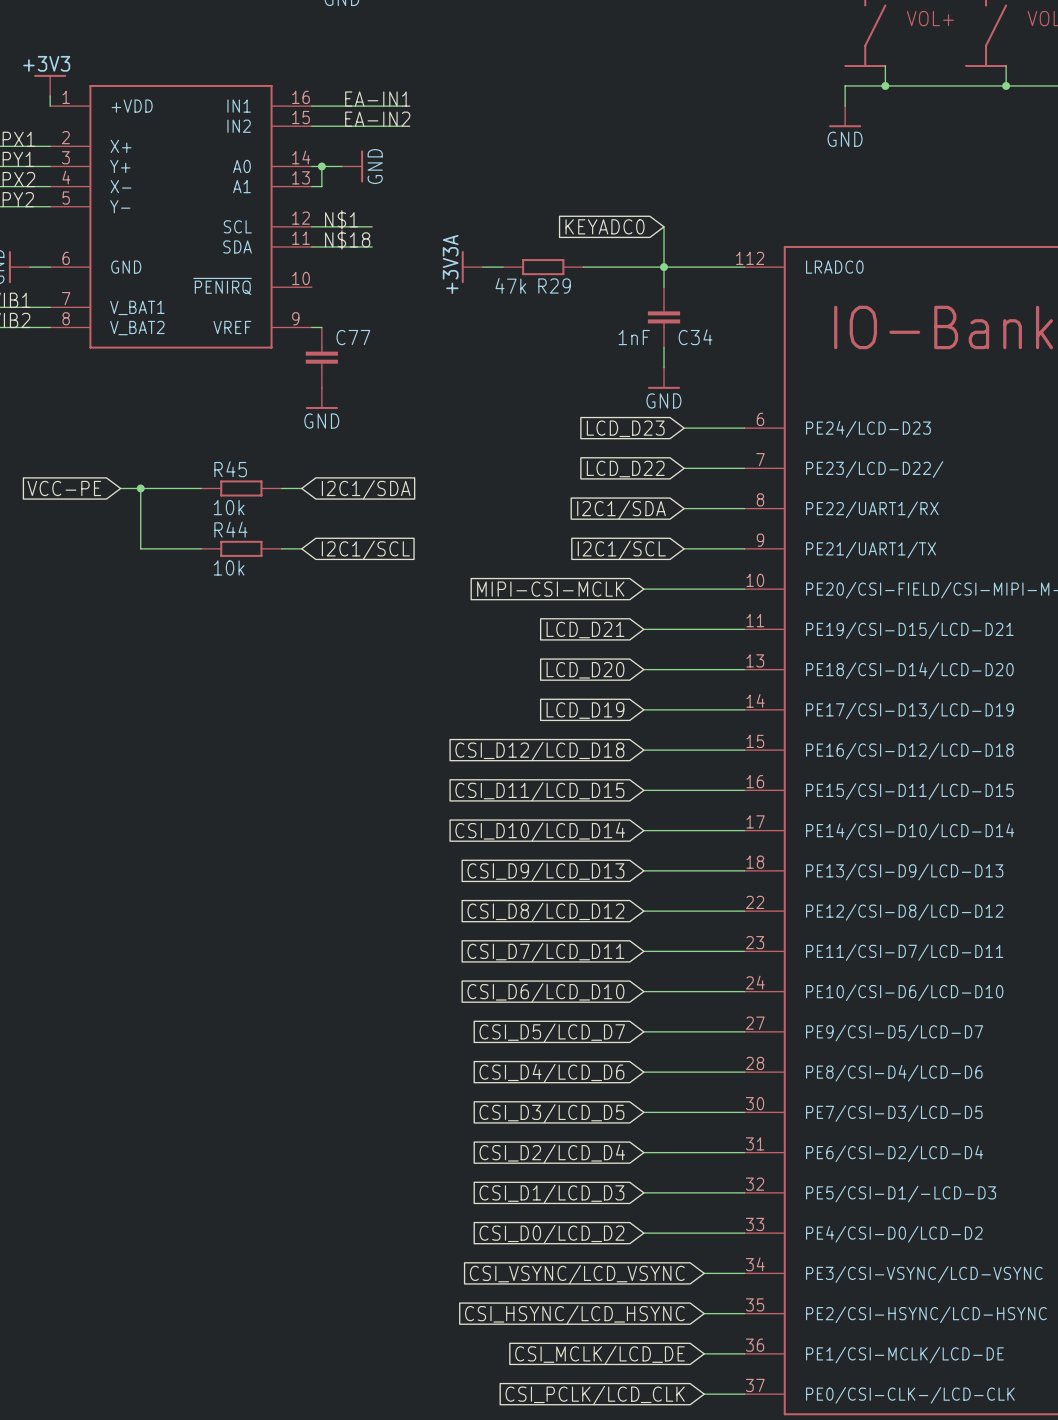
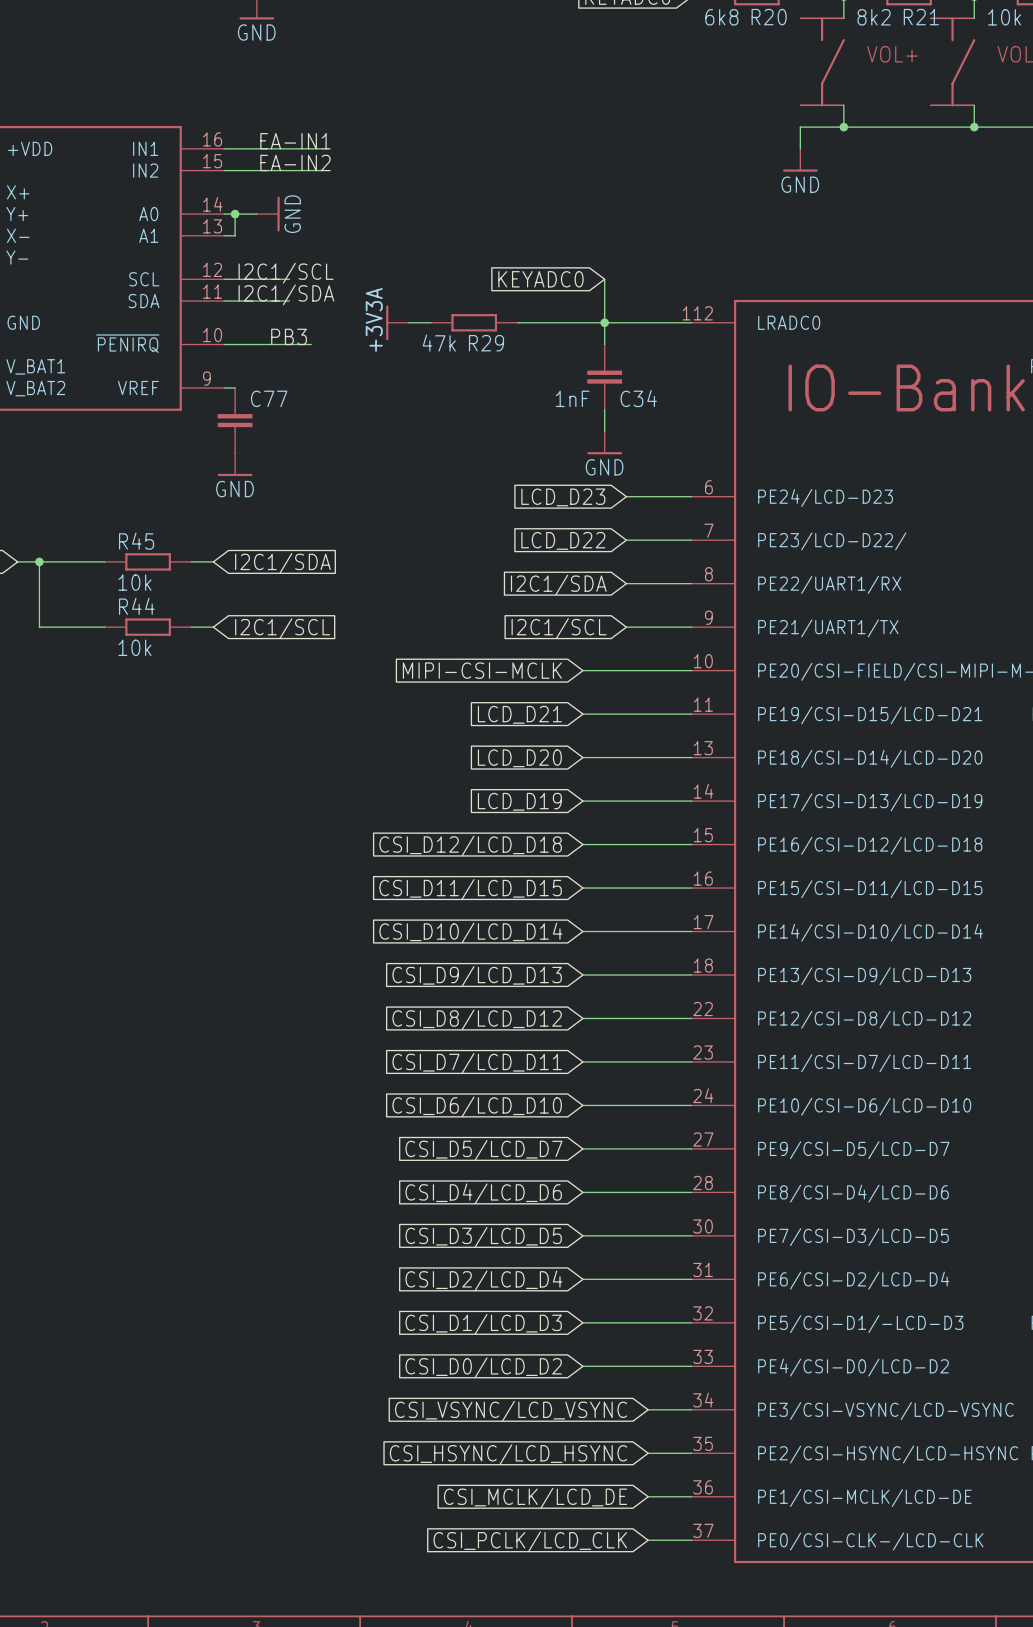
label: N$1 (341, 219) -> I2C1/SCL (286, 273)
label: N$18 (347, 239) -> I2C1/SDA (286, 294)
label: none -> PB3 (289, 336)
wire: none -> (224, 344) (311, 344)

